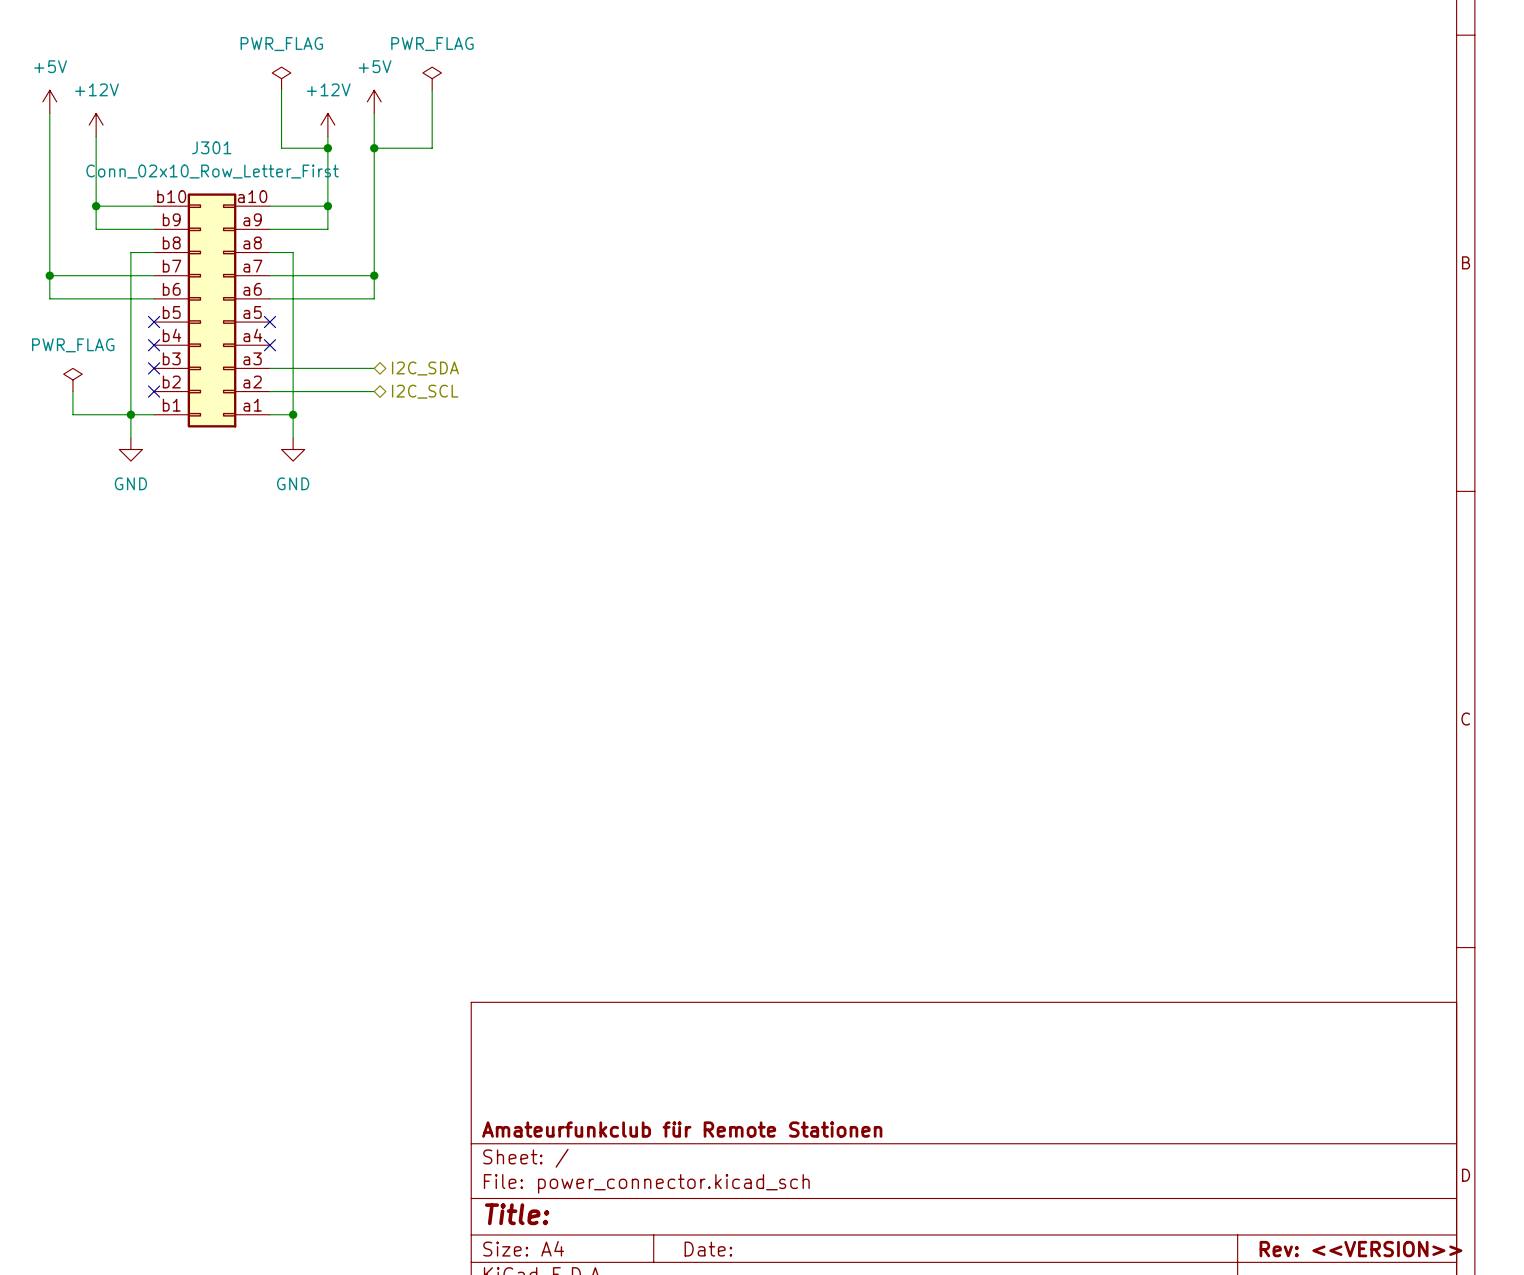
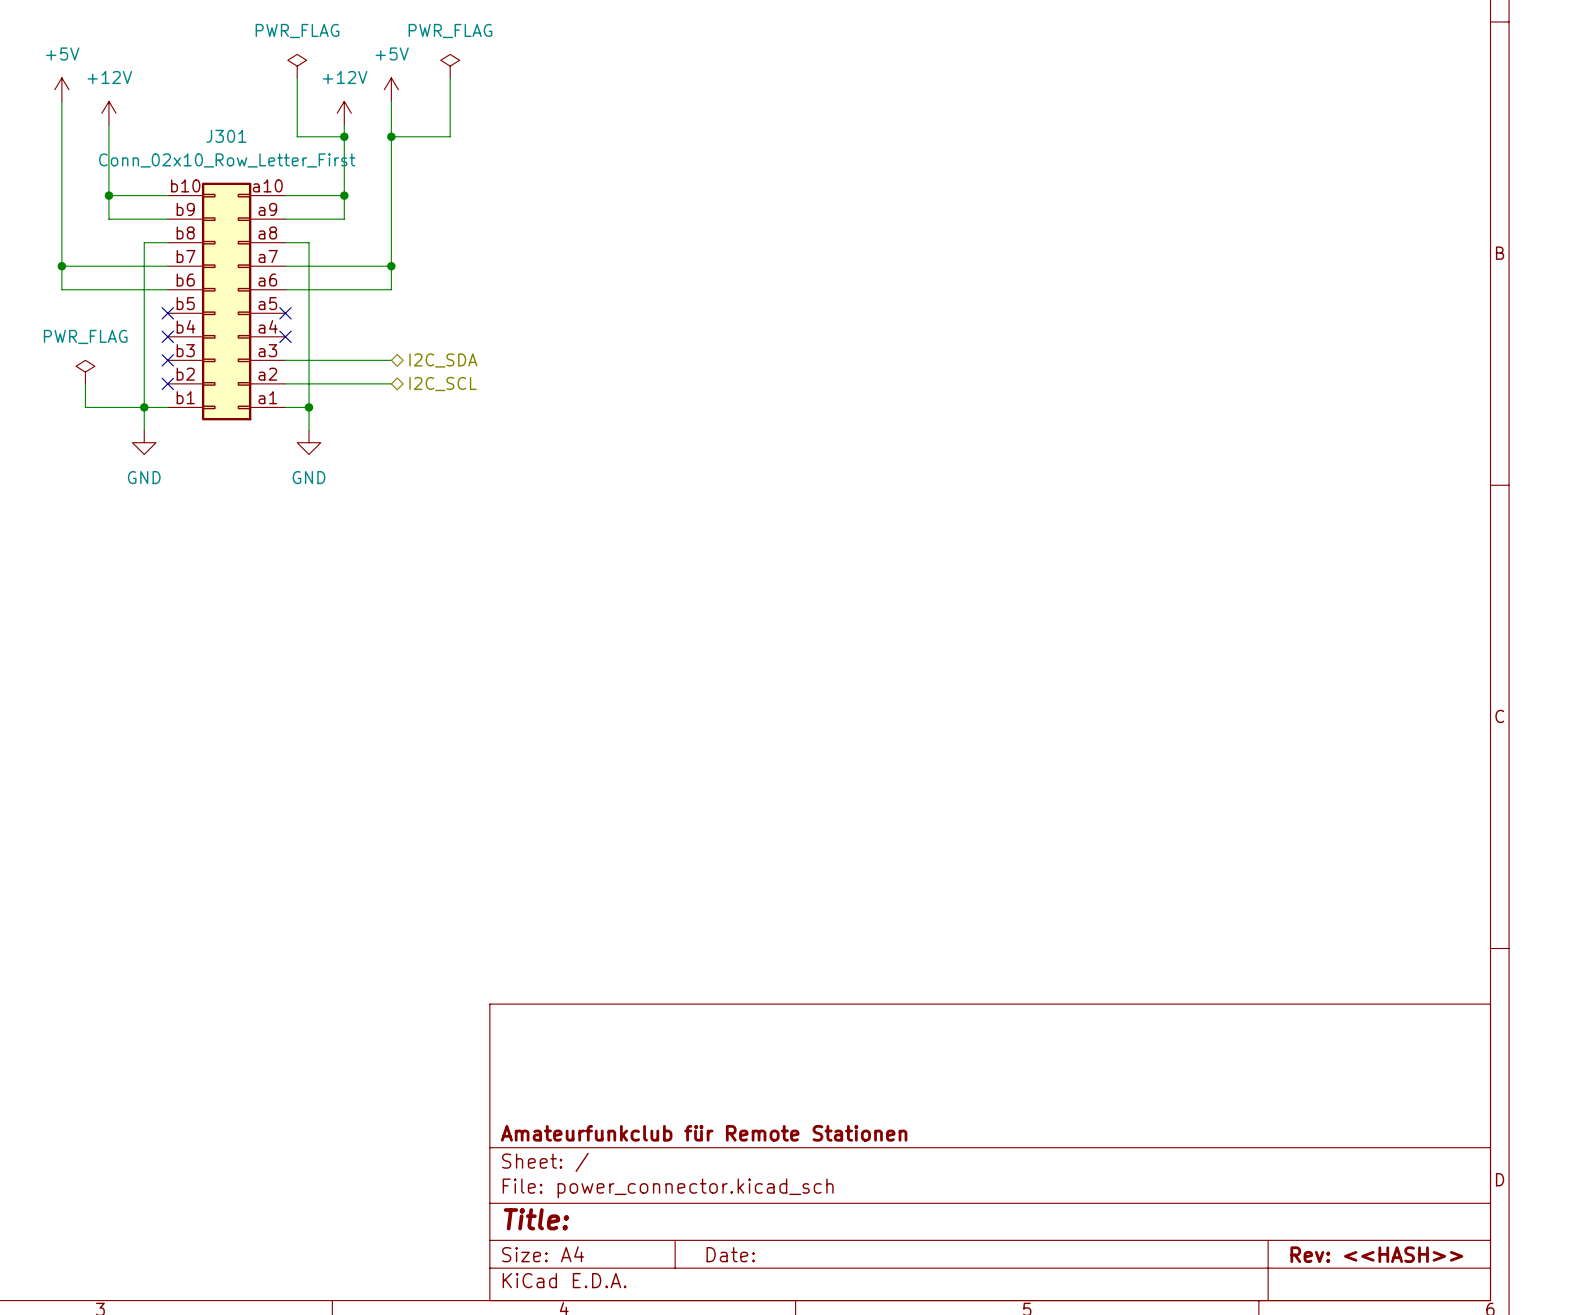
title block: Rev: <<VERSION>> (1360, 1249) -> Rev: <<HASH>> (1376, 1254)

